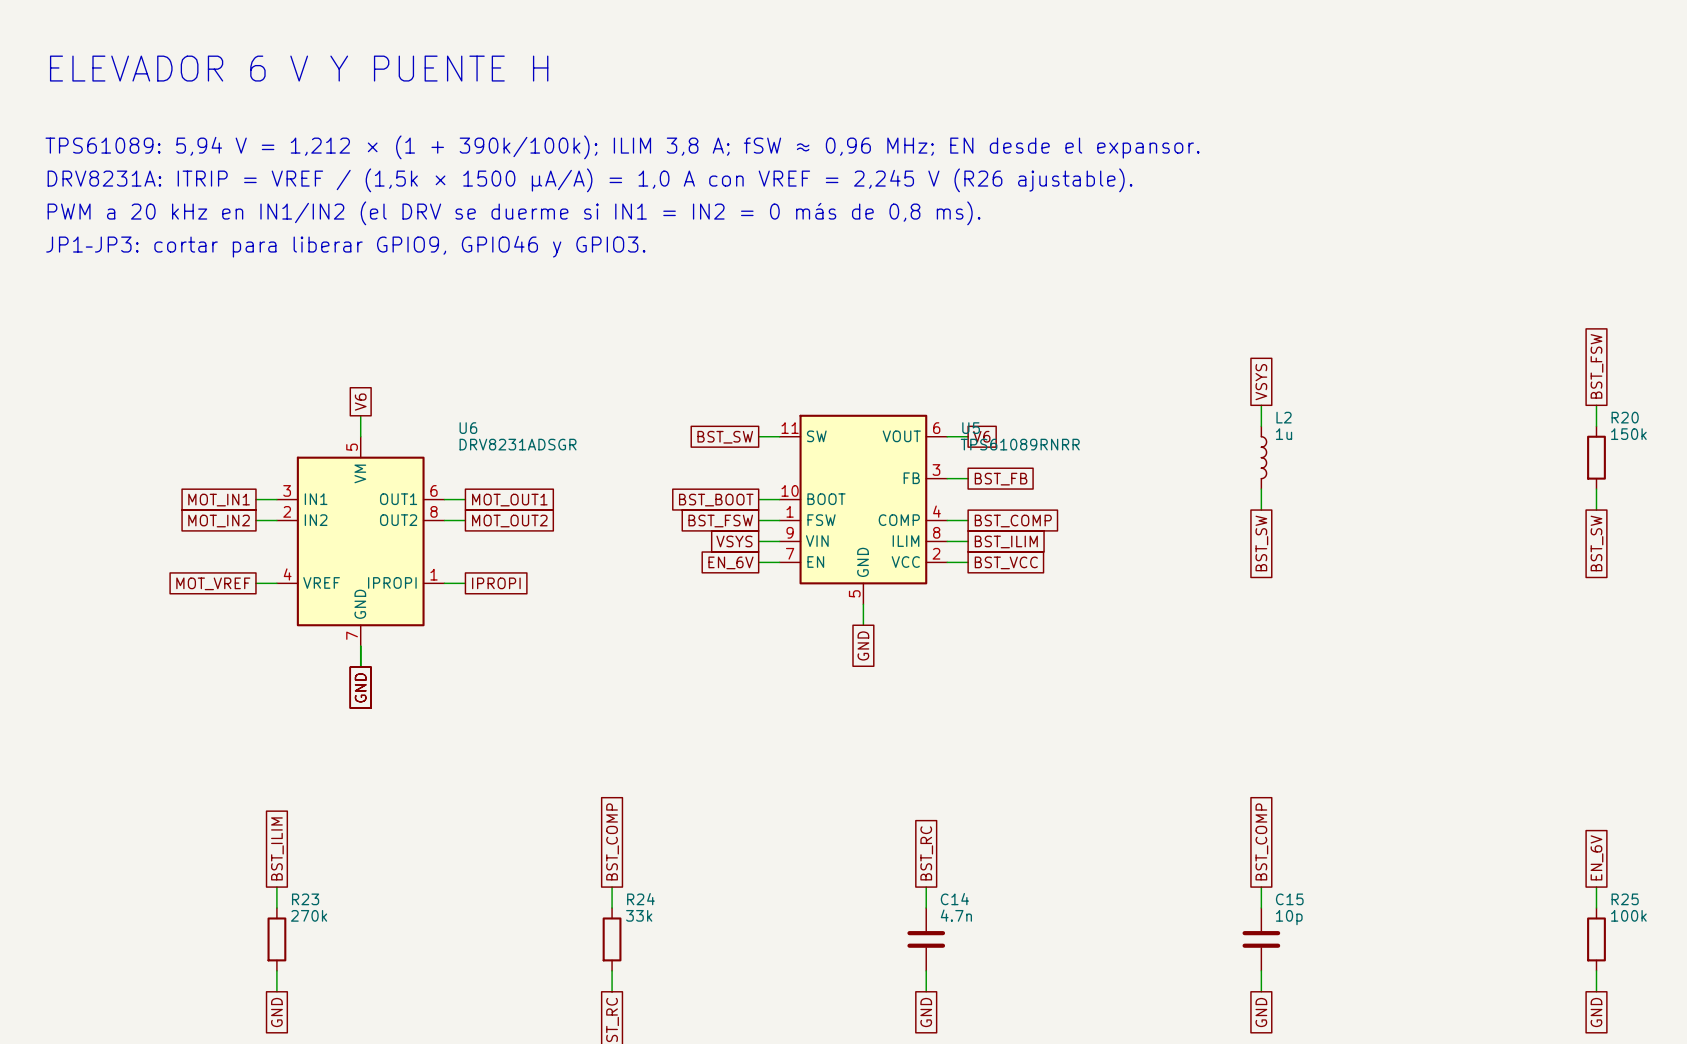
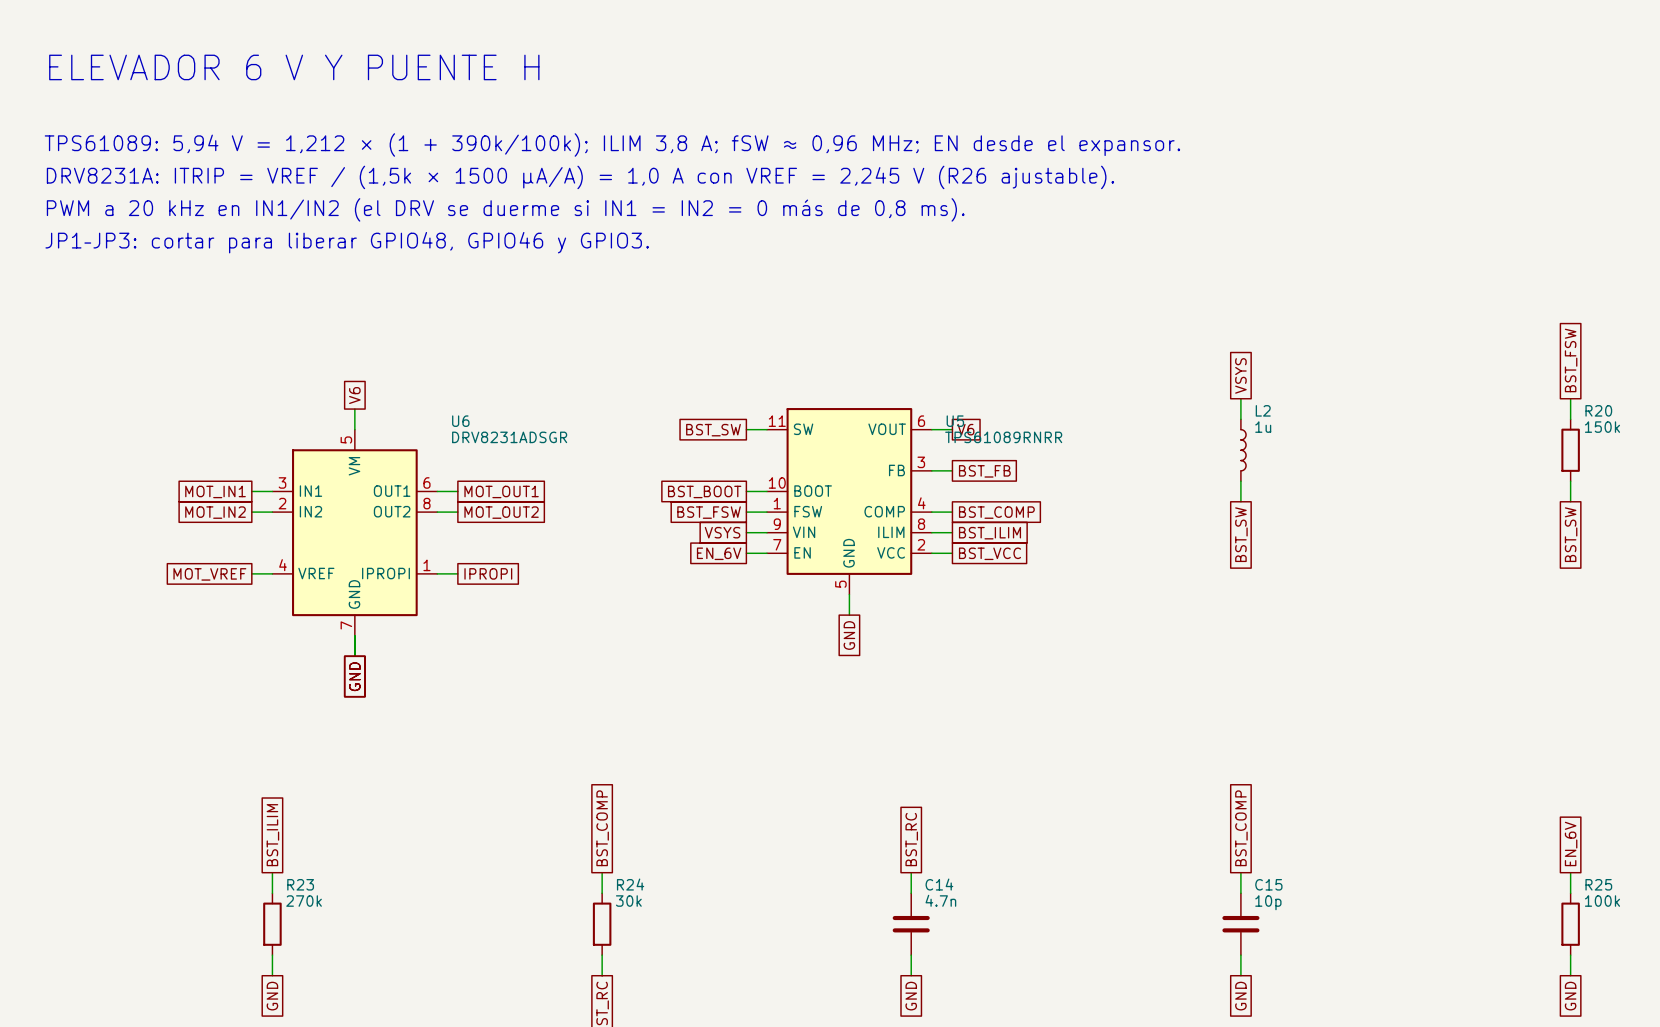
text: JP1–JP3: cortar para liberar GPIO9, GPIO46 y GPIO3. (345, 246) -> JP1–JP3: cortar para liberar GPIO48, GPIO46 y GPIO3. (347, 242)
R24 value: 33k (639, 915) -> 30k (628, 901)

